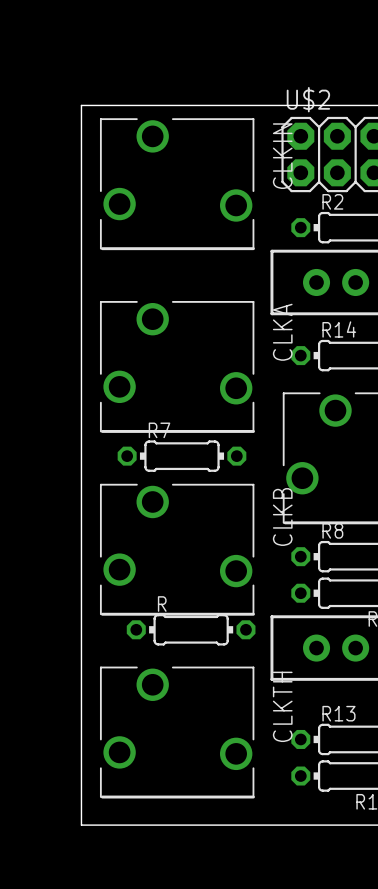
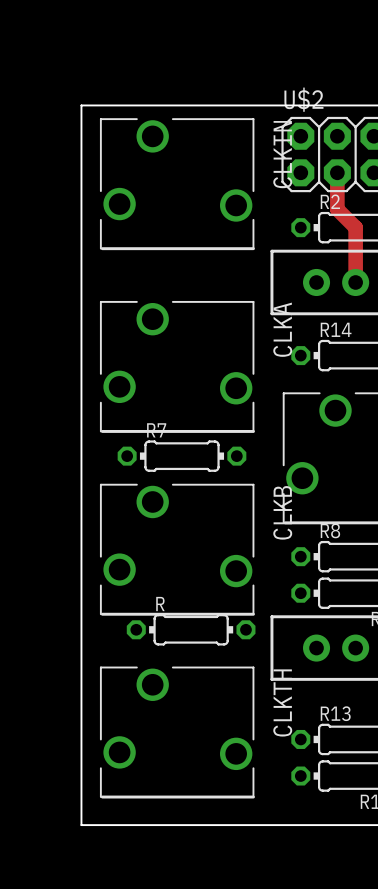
track: none -> (337, 172) (337, 209) (355, 227) (355, 282)

